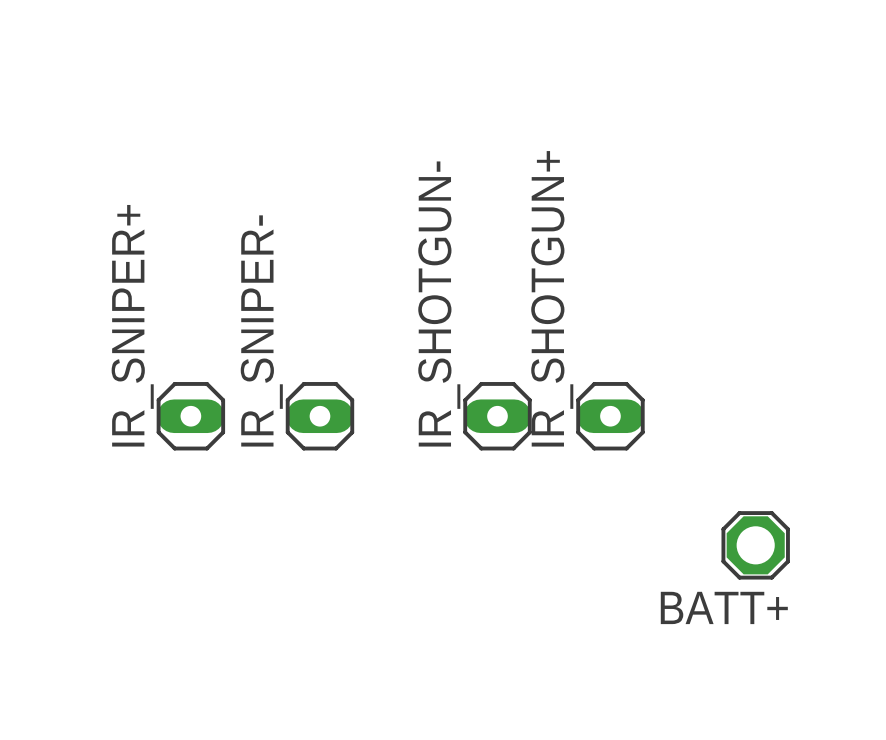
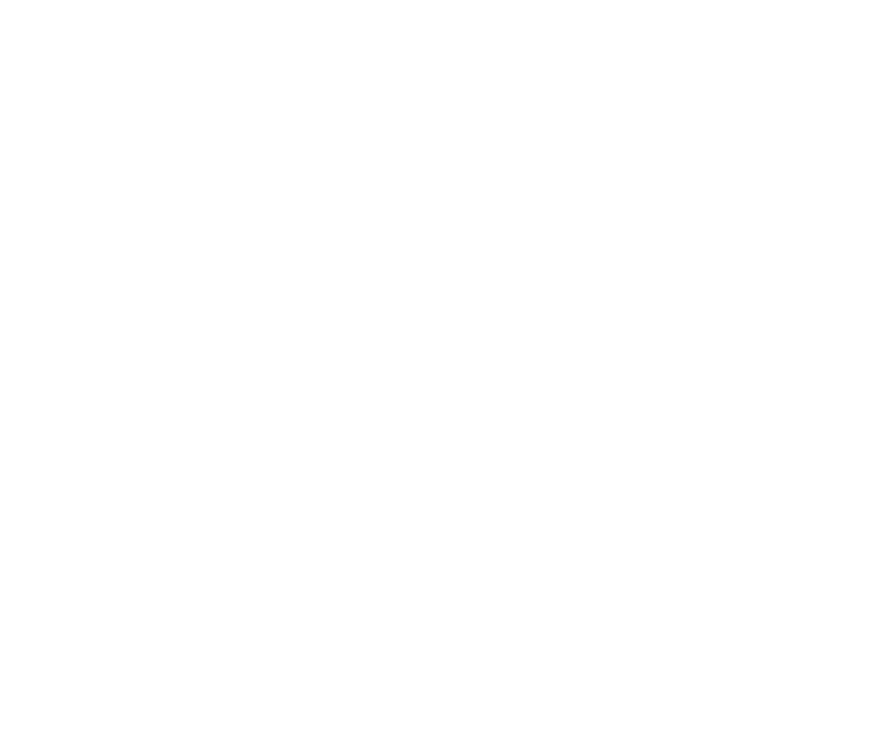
IR_SNIPER+: (190, 416) -> none
IR_SNIPER-: (319, 416) -> none
IR_SHOTGUN-: (497, 416) -> none
IR_SHOTGUN+: (610, 416) -> none
BATT+: (755, 545) -> none

